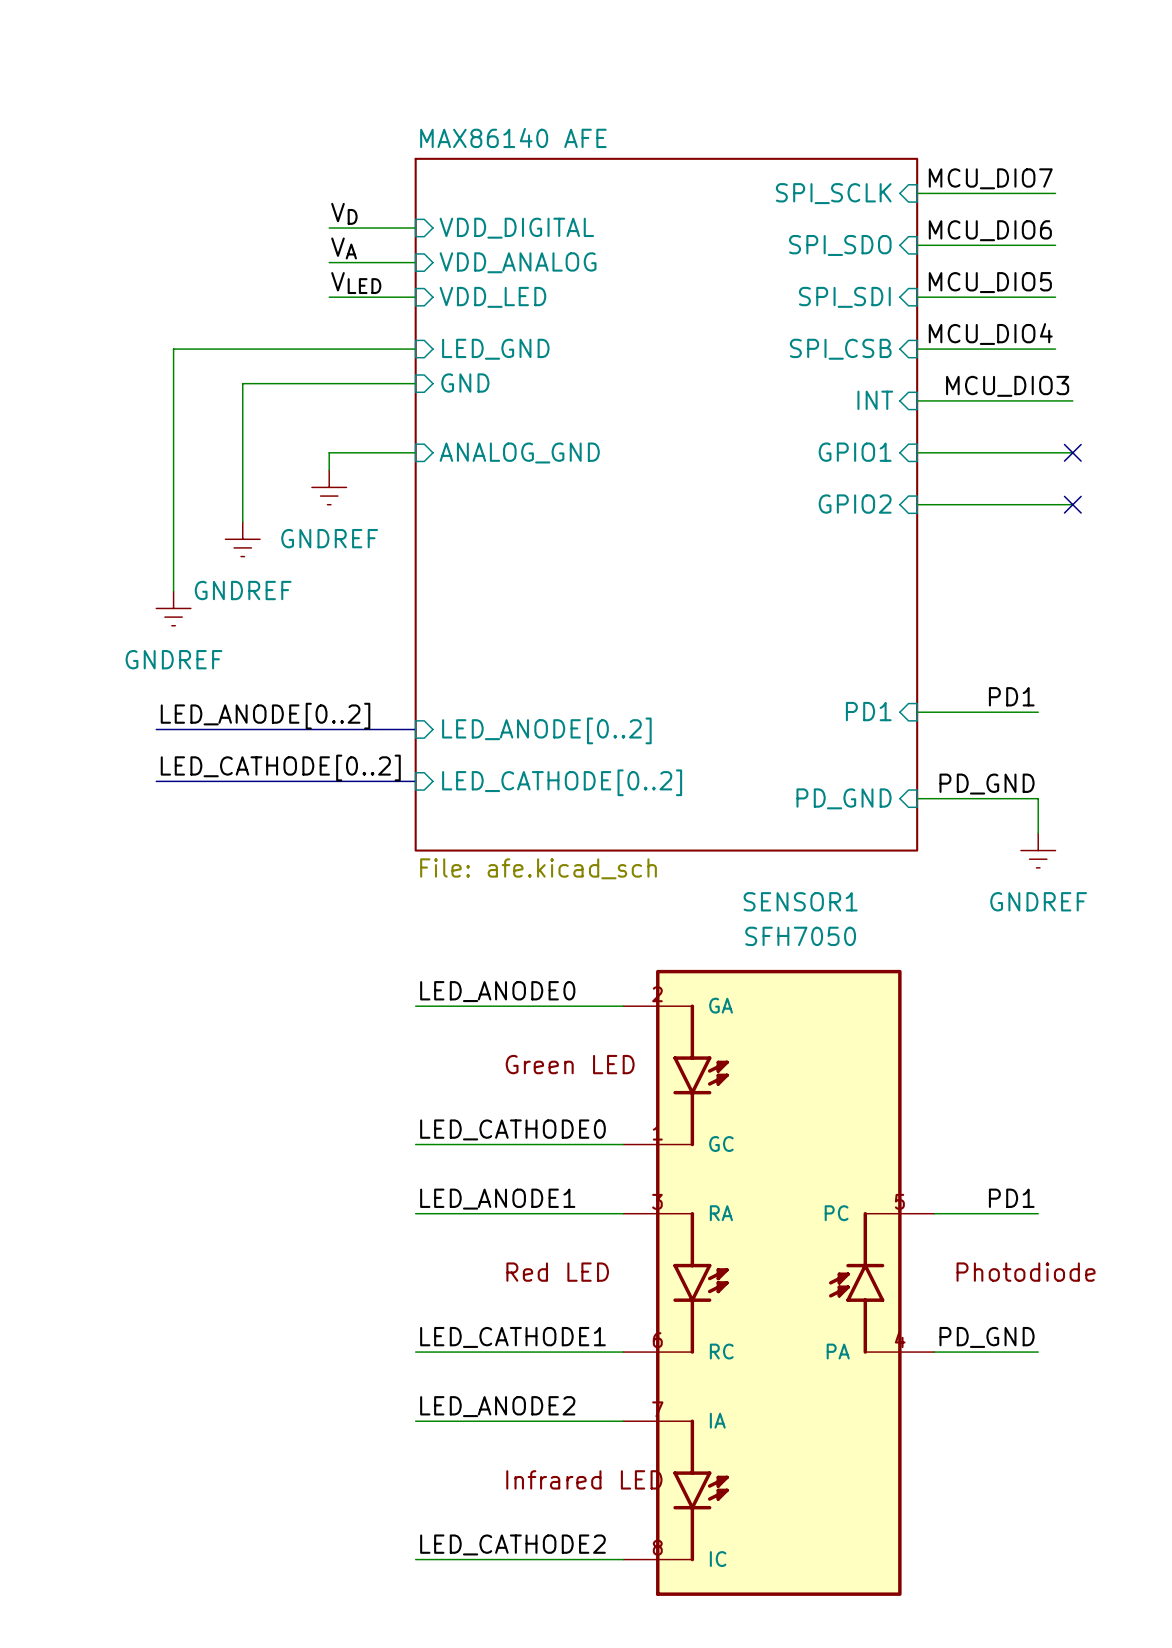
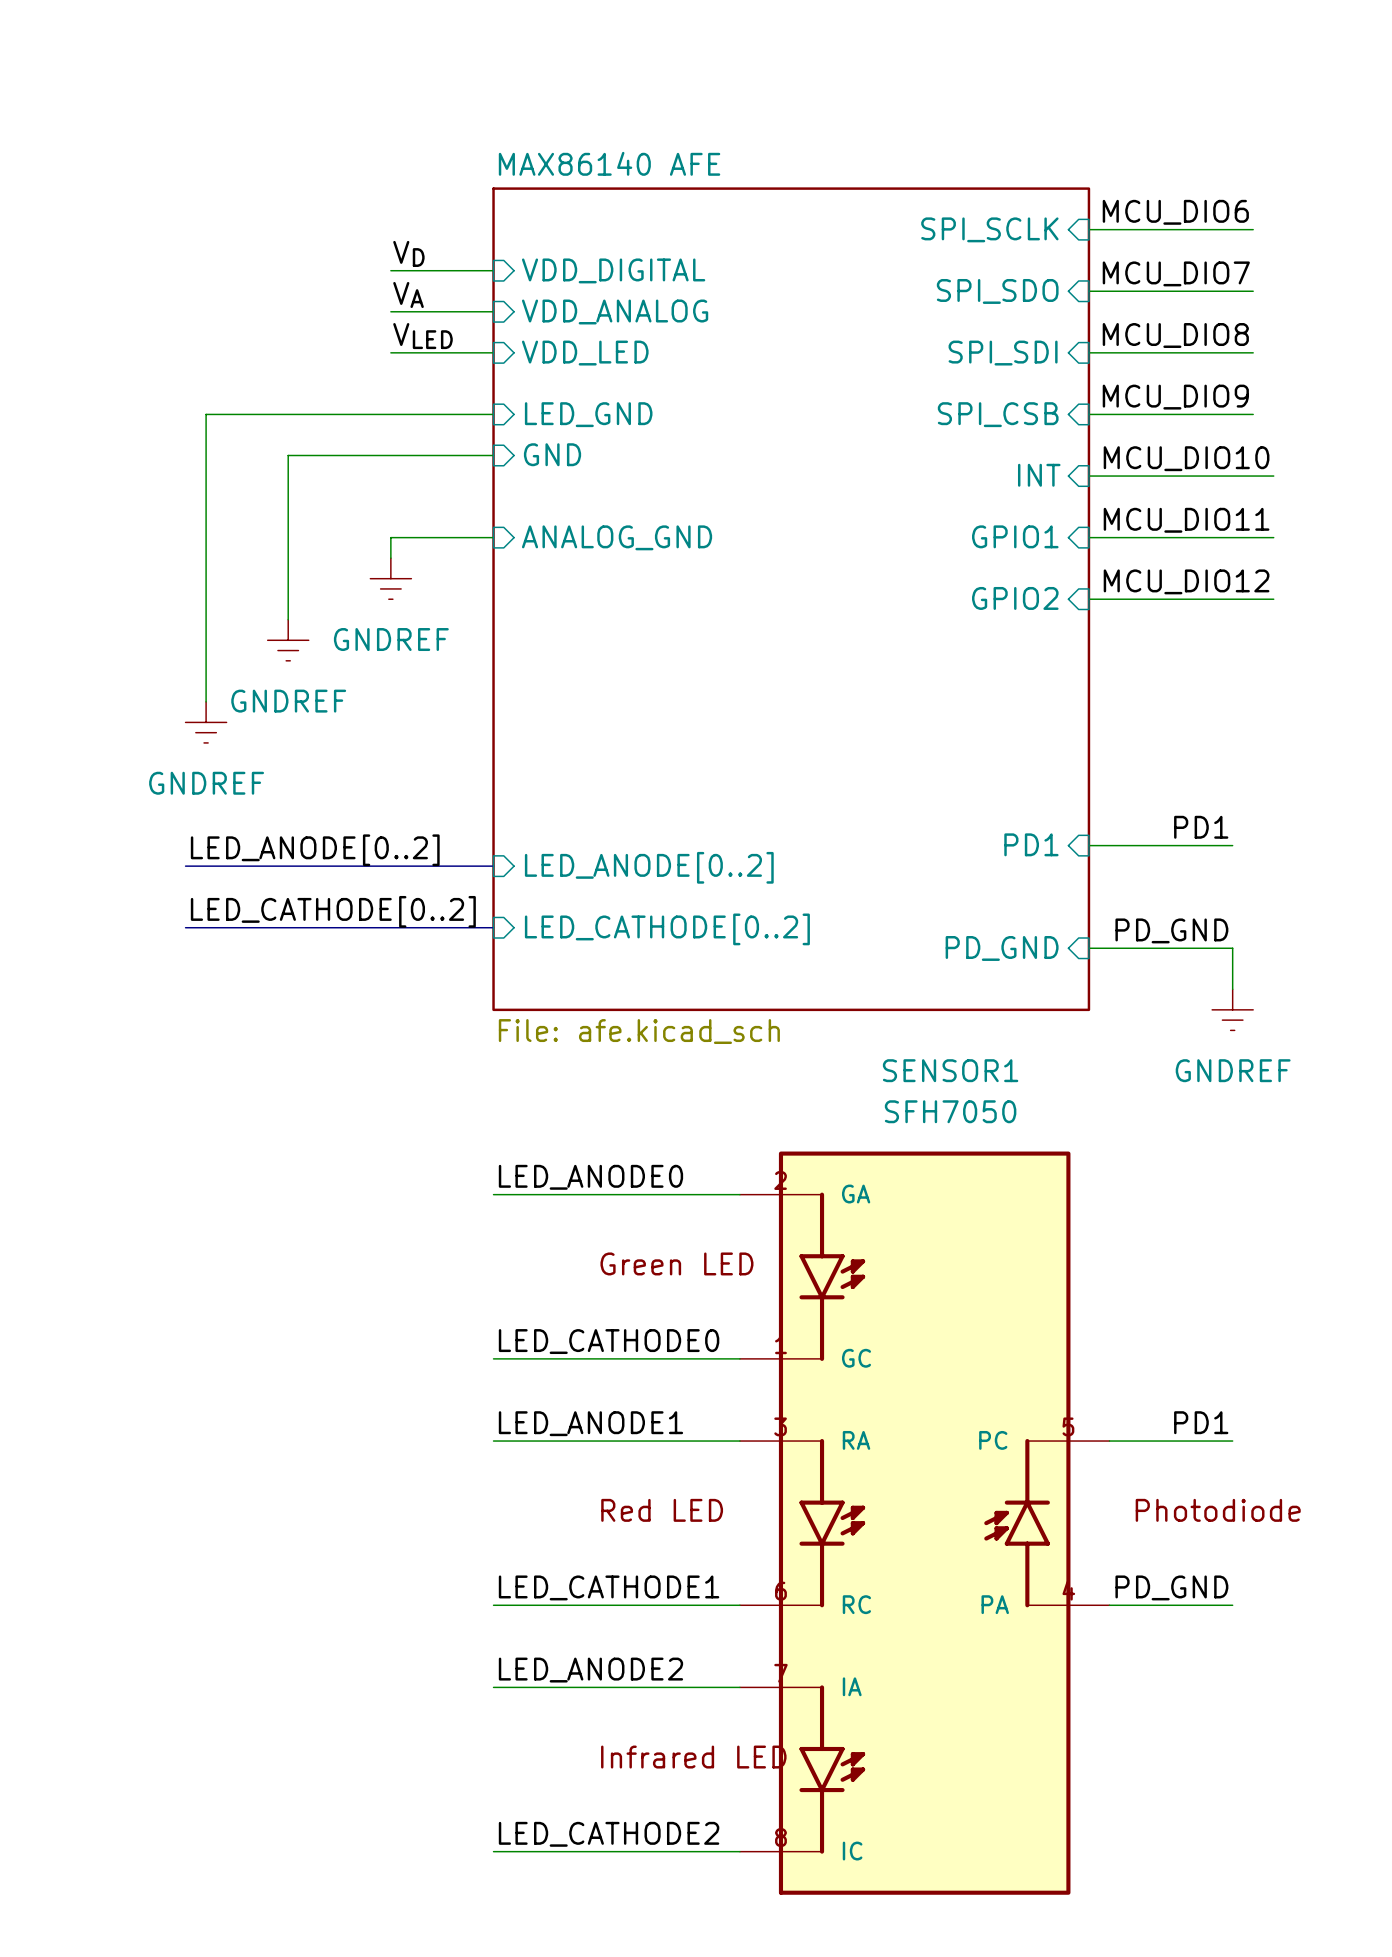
label: MCU_DIO7 (990, 178) -> MCU_DIO6 (1175, 212)
label: MCU_DIO6 (990, 230) -> MCU_DIO7 (1176, 273)
label: MCU_DIO5 (990, 282) -> MCU_DIO8 (1175, 335)
label: MCU_DIO4 (990, 334) -> MCU_DIO9 (1175, 397)
label: MCU_DIO3 (1007, 386) -> MCU_DIO10 (1186, 458)
label: none -> MCU_DIO11 (1186, 520)
no-connect mark: (1072, 452) -> none
label: none -> MCU_DIO12 (1186, 581)
no-connect mark: (1072, 504) -> none

